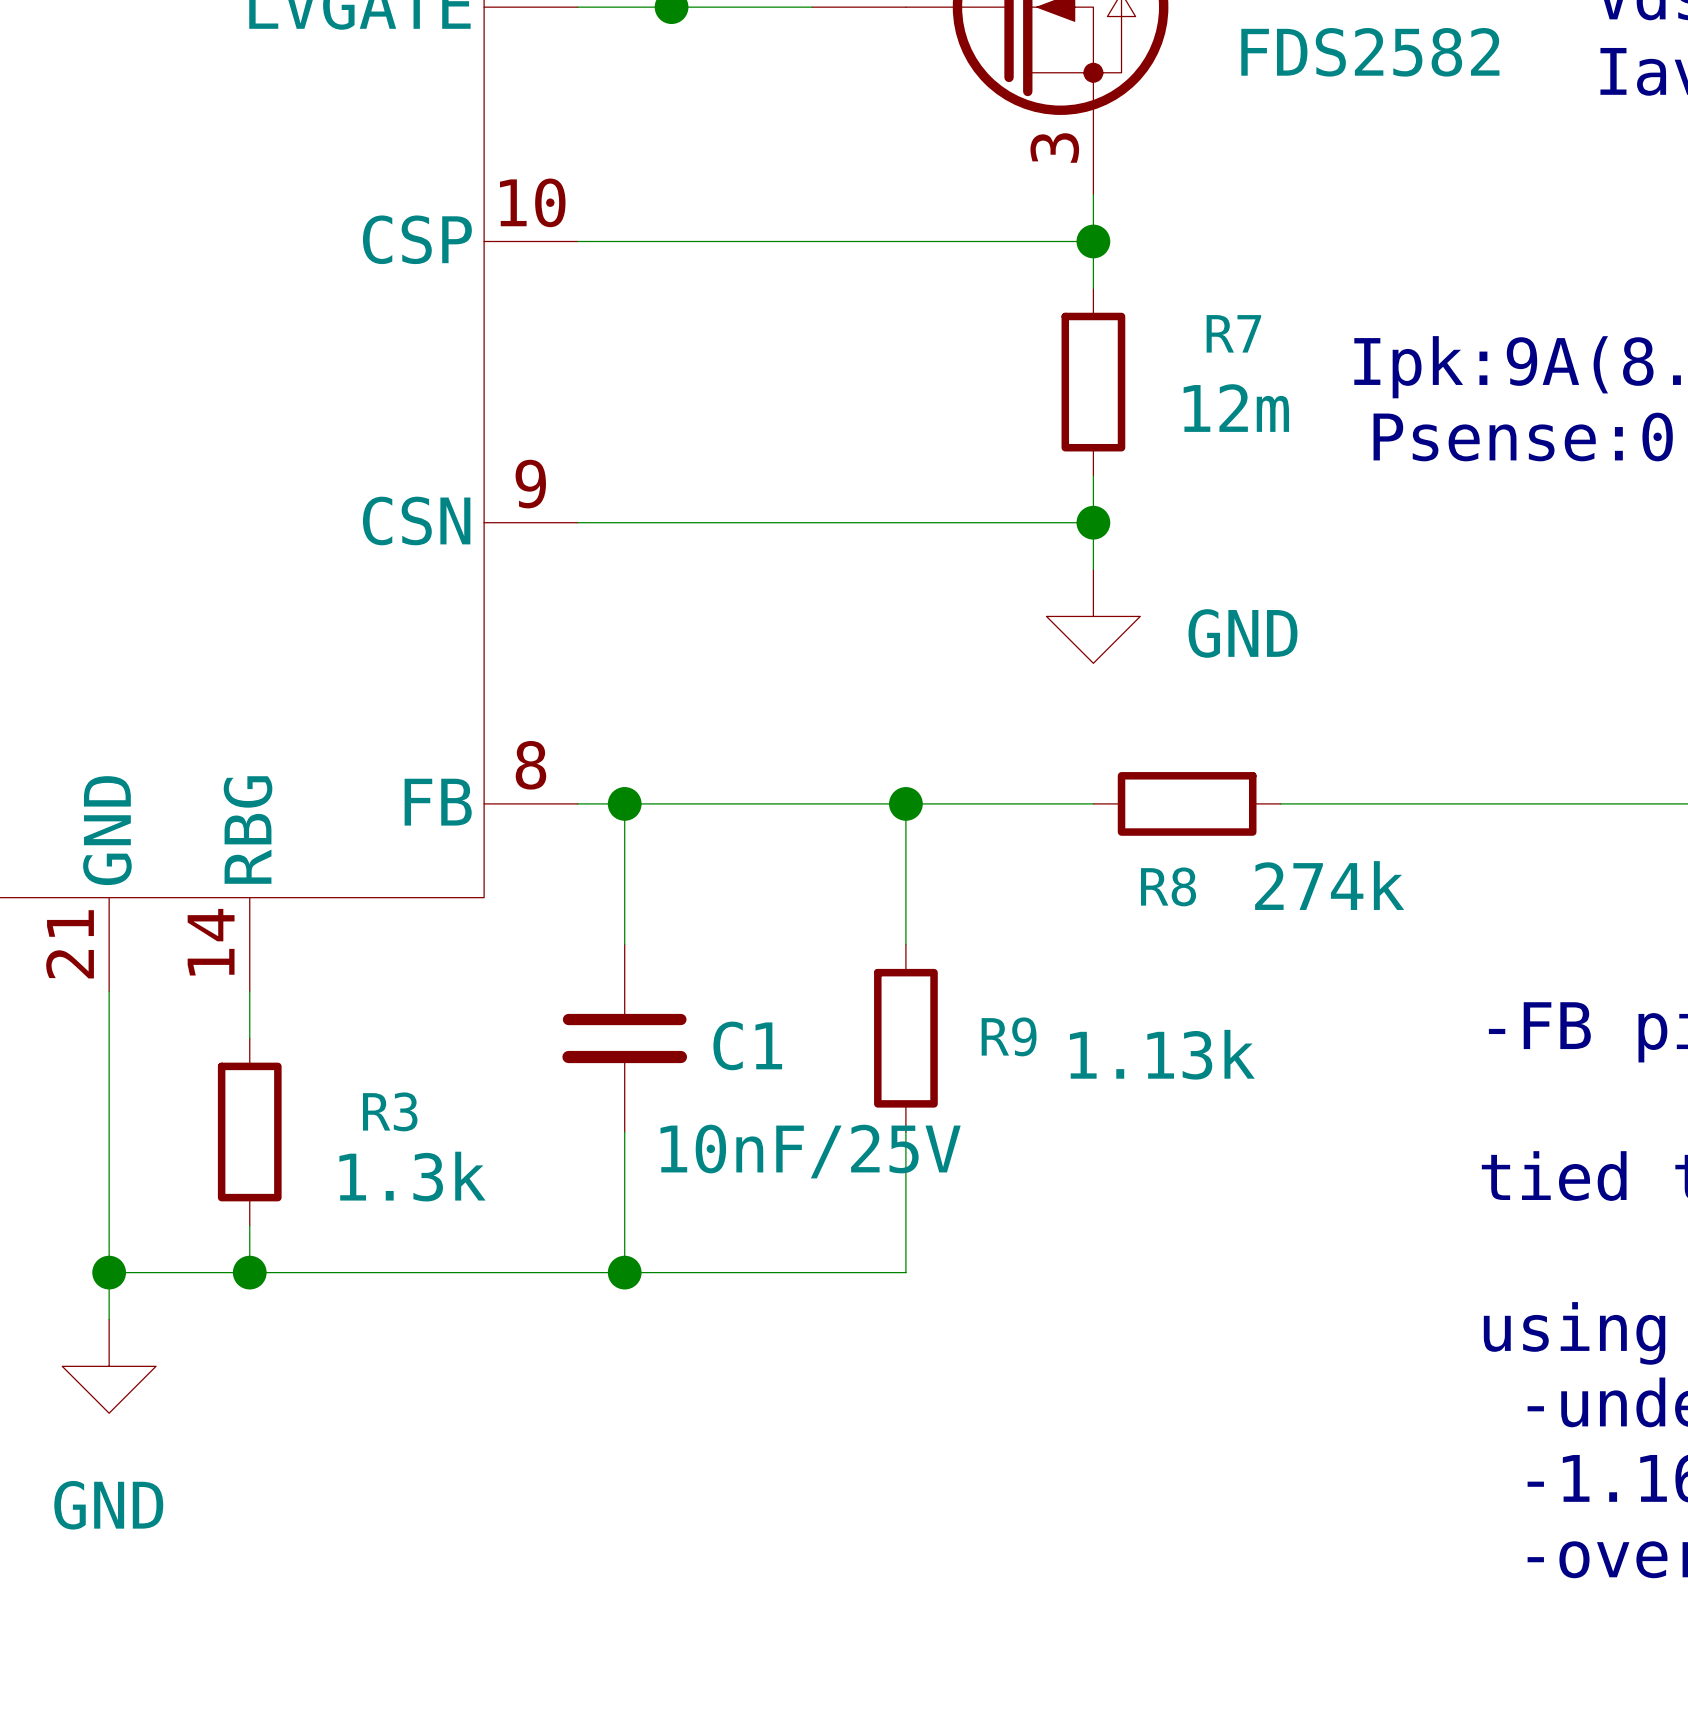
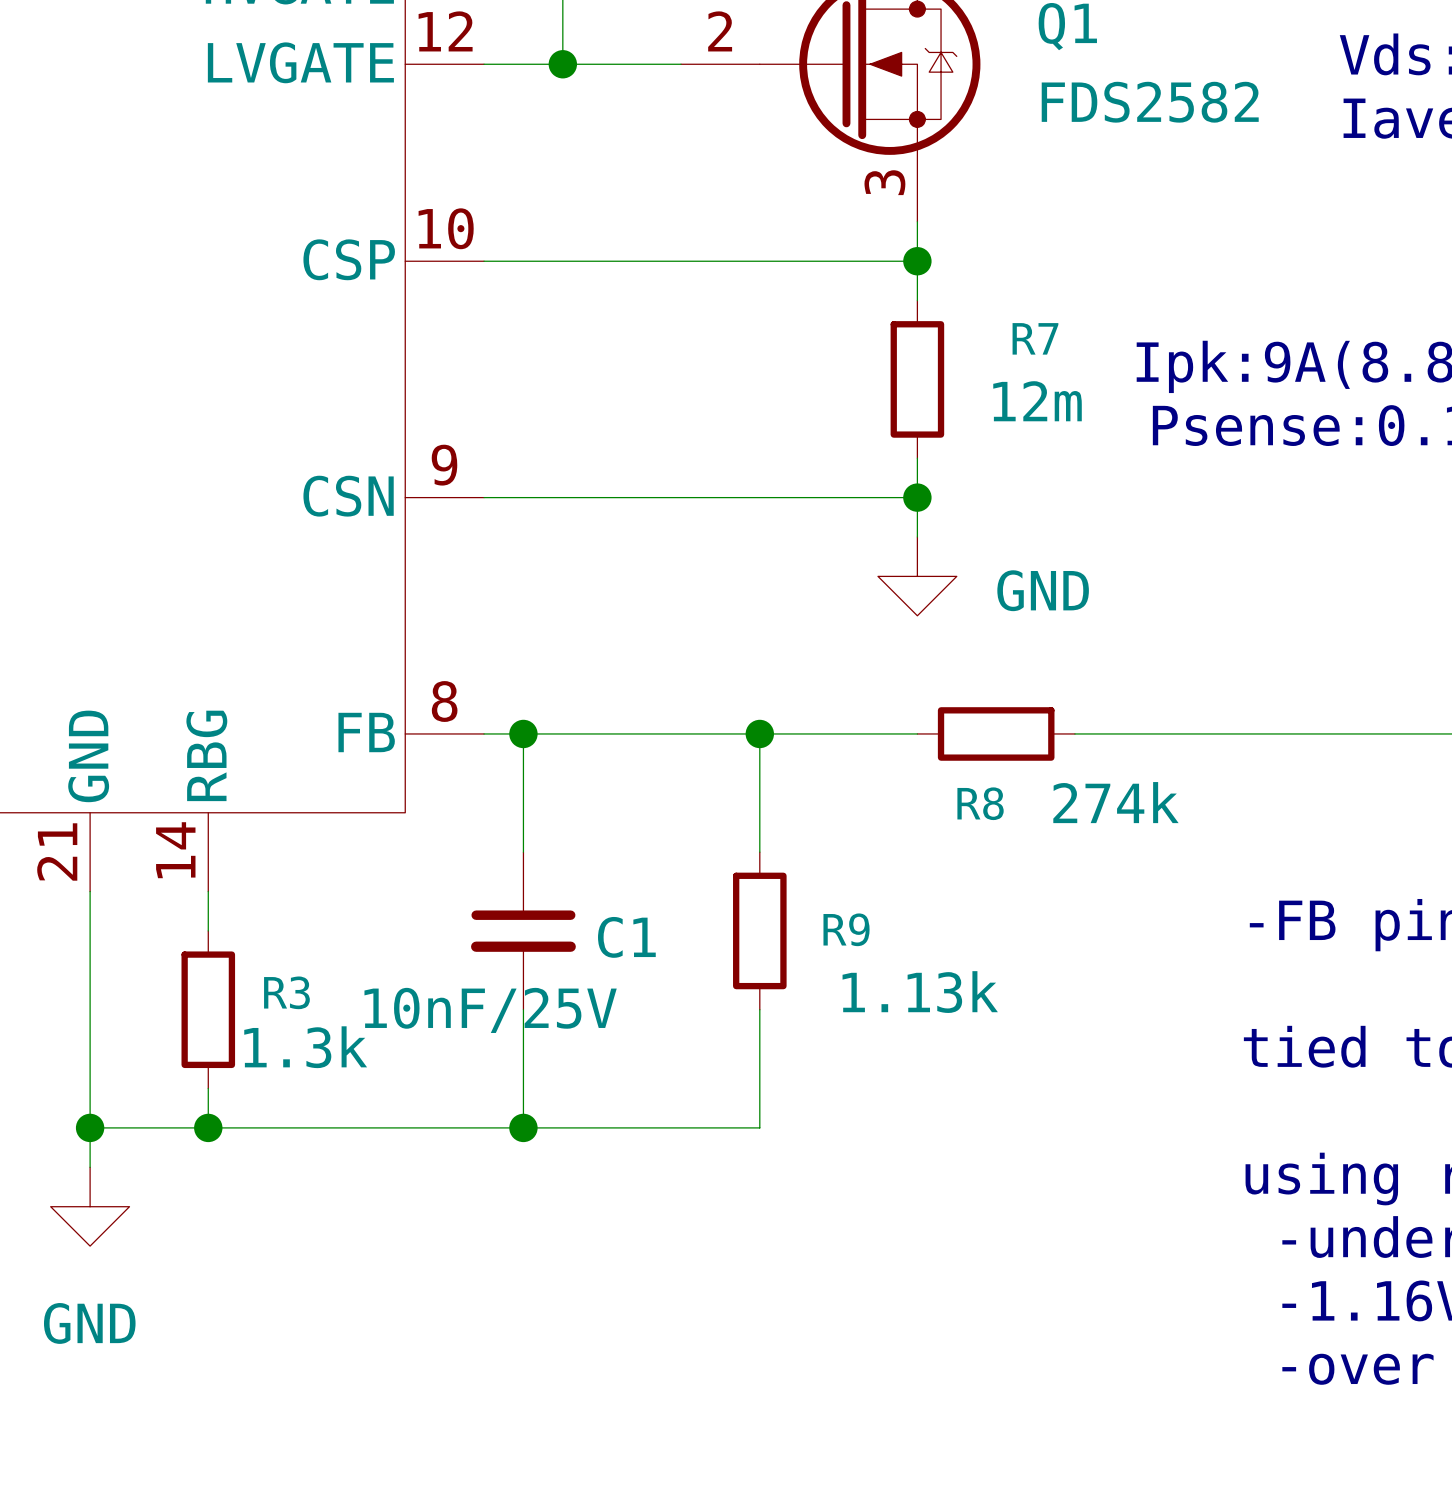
R9 value position: 1.13k (1162, 1054) -> 1.13k (920, 992)
R3 name position: R3 (390, 1111) -> R3 (286, 992)
C1 value position: 10nF/25V (810, 1151) -> 10nF/25V (490, 1010)
R3 value position: 1.3k (412, 1176) -> 1.3k (305, 1047)

